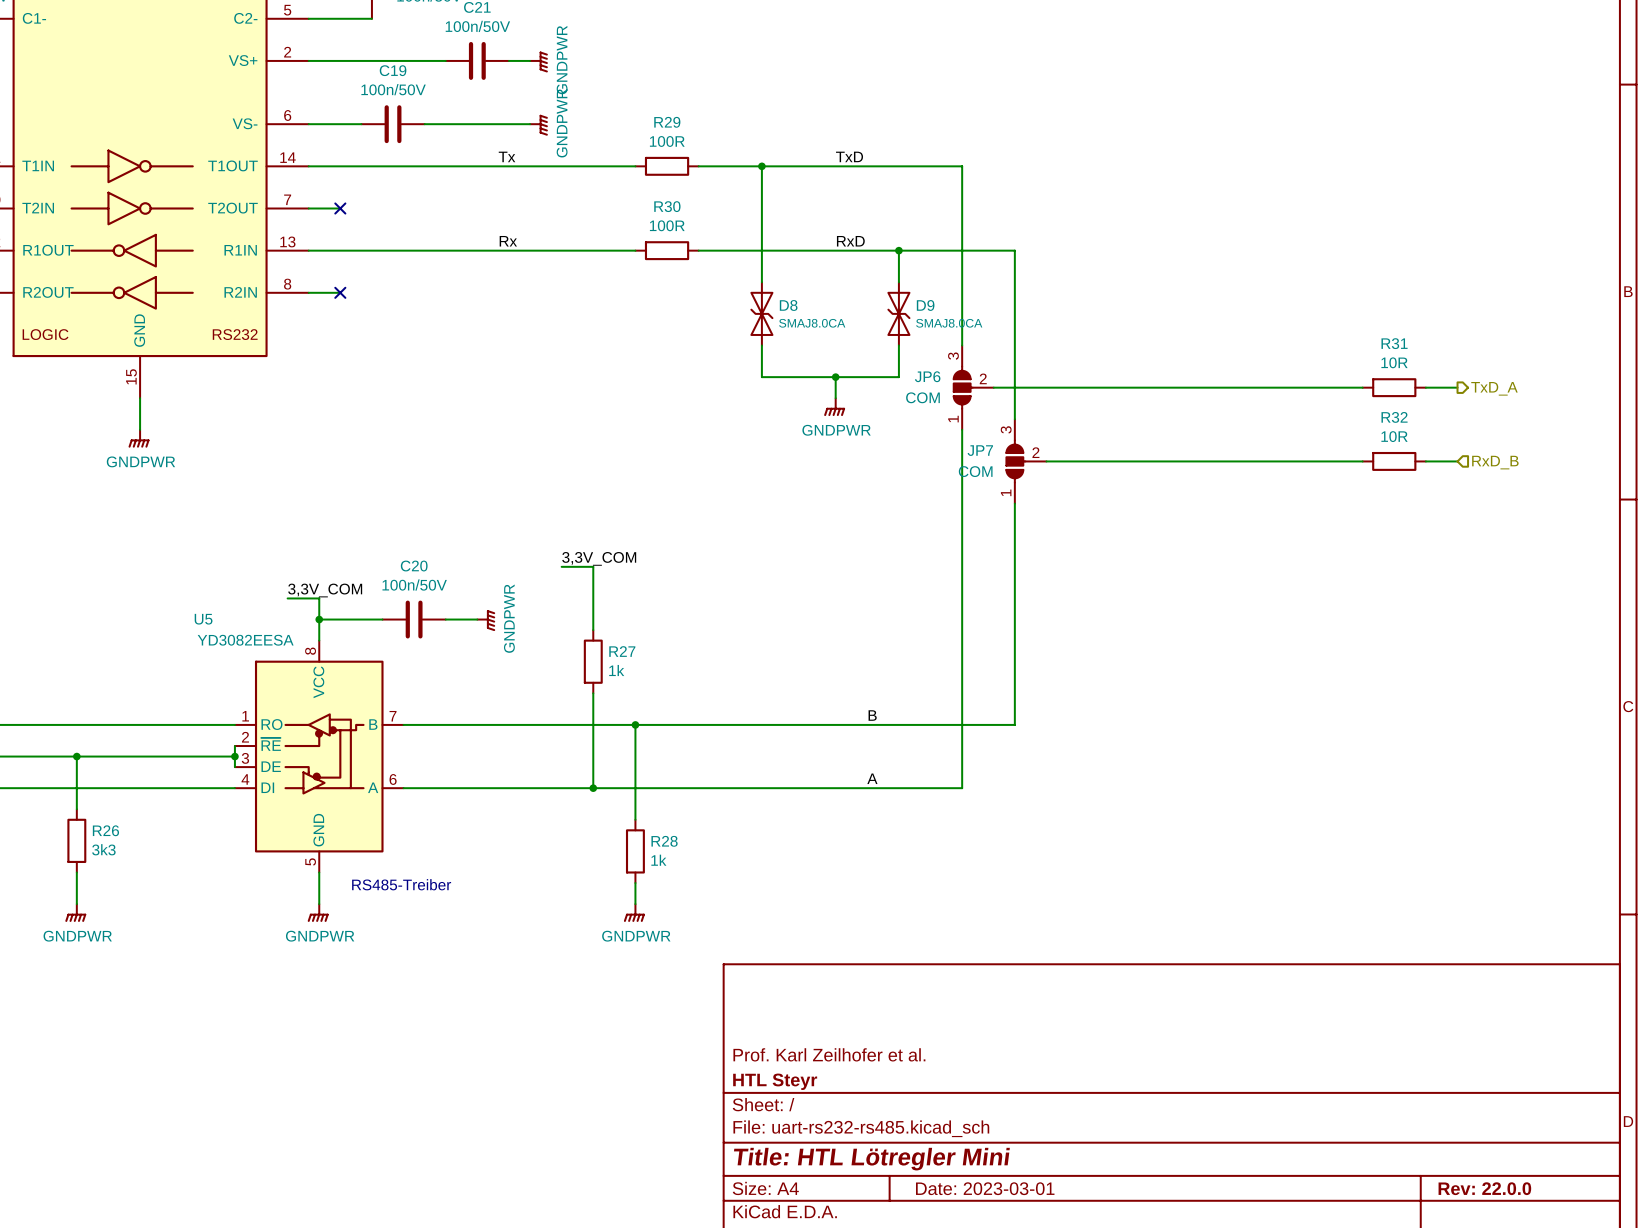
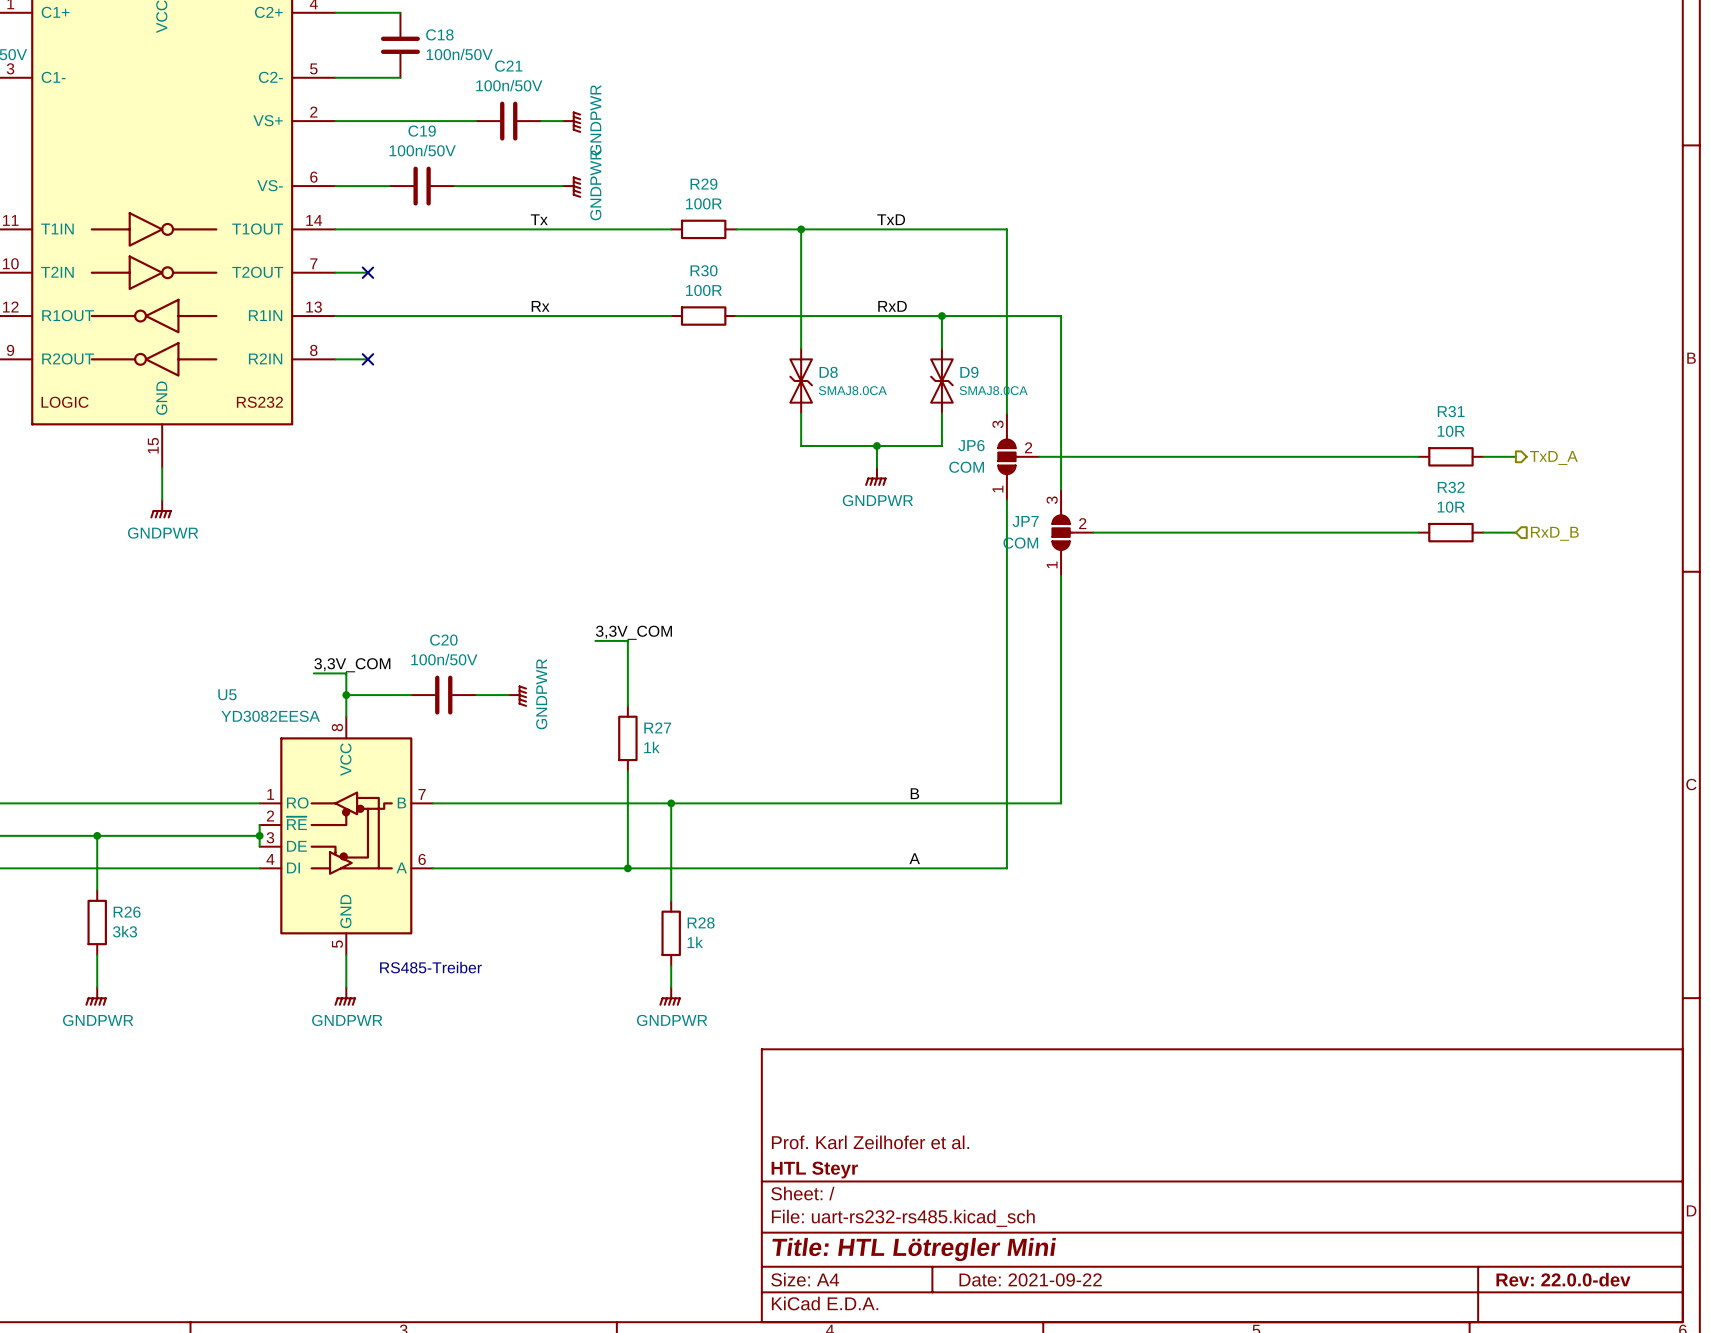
title block: Date: 2023-03-01 (985, 1188) -> Date: 2021-09-22 (1030, 1279)
title block: Rev: 22.0.0 (1484, 1188) -> Rev: 22.0.0-dev (1563, 1279)

